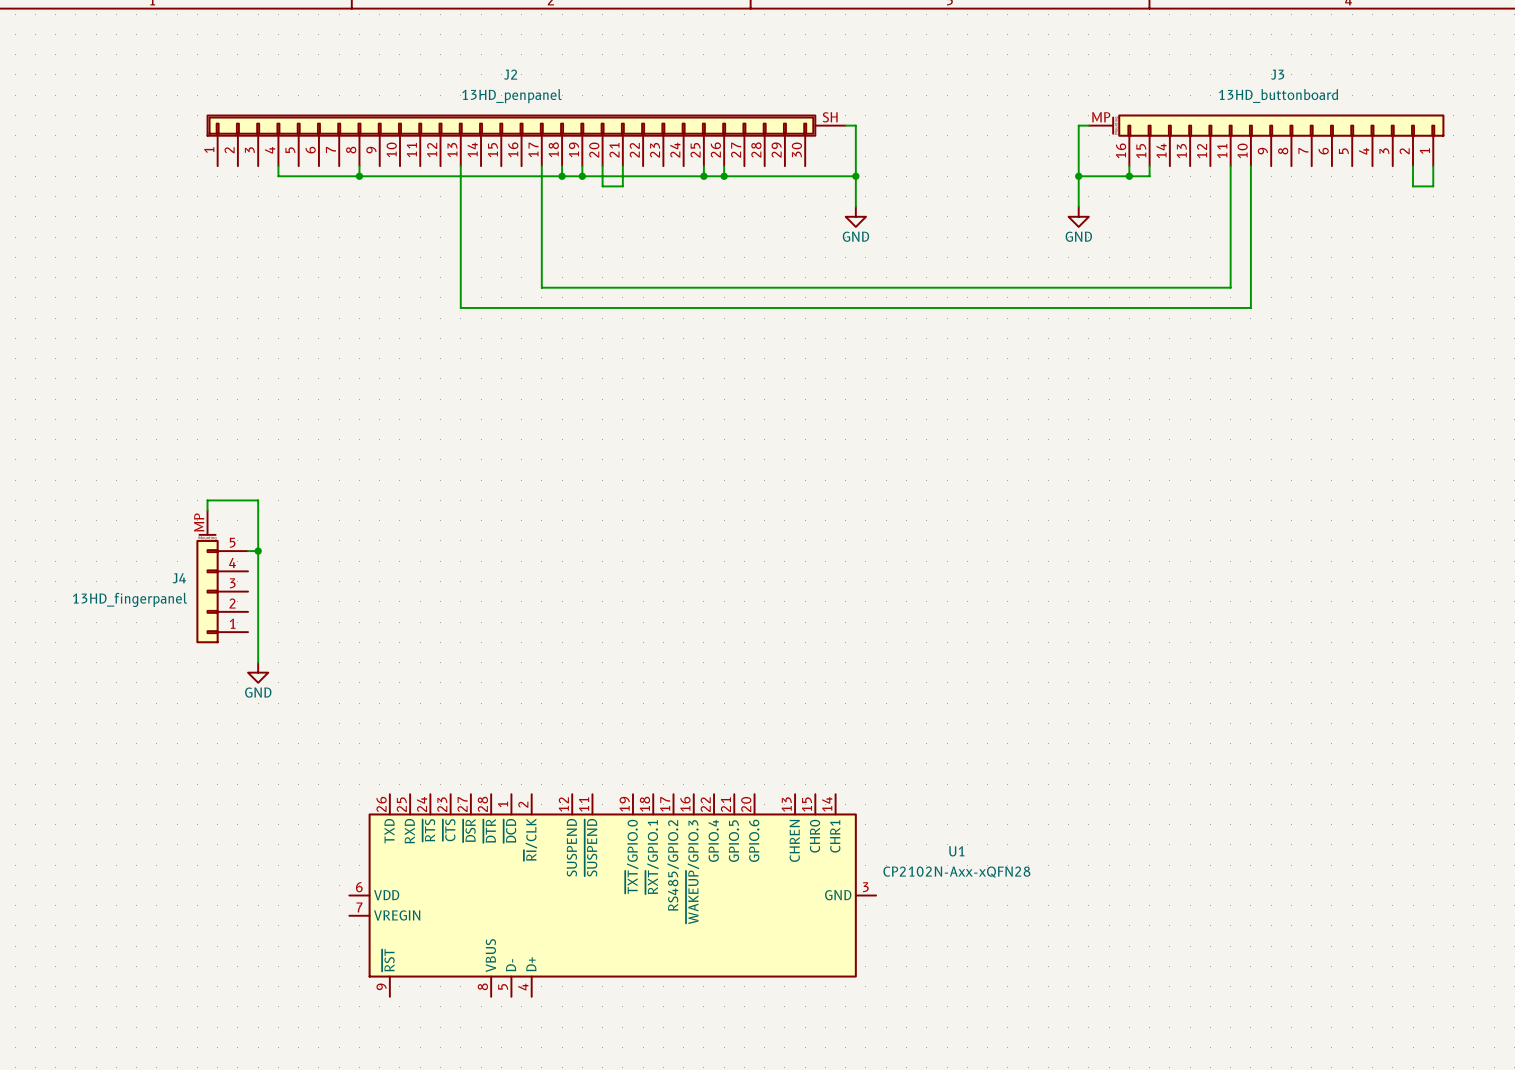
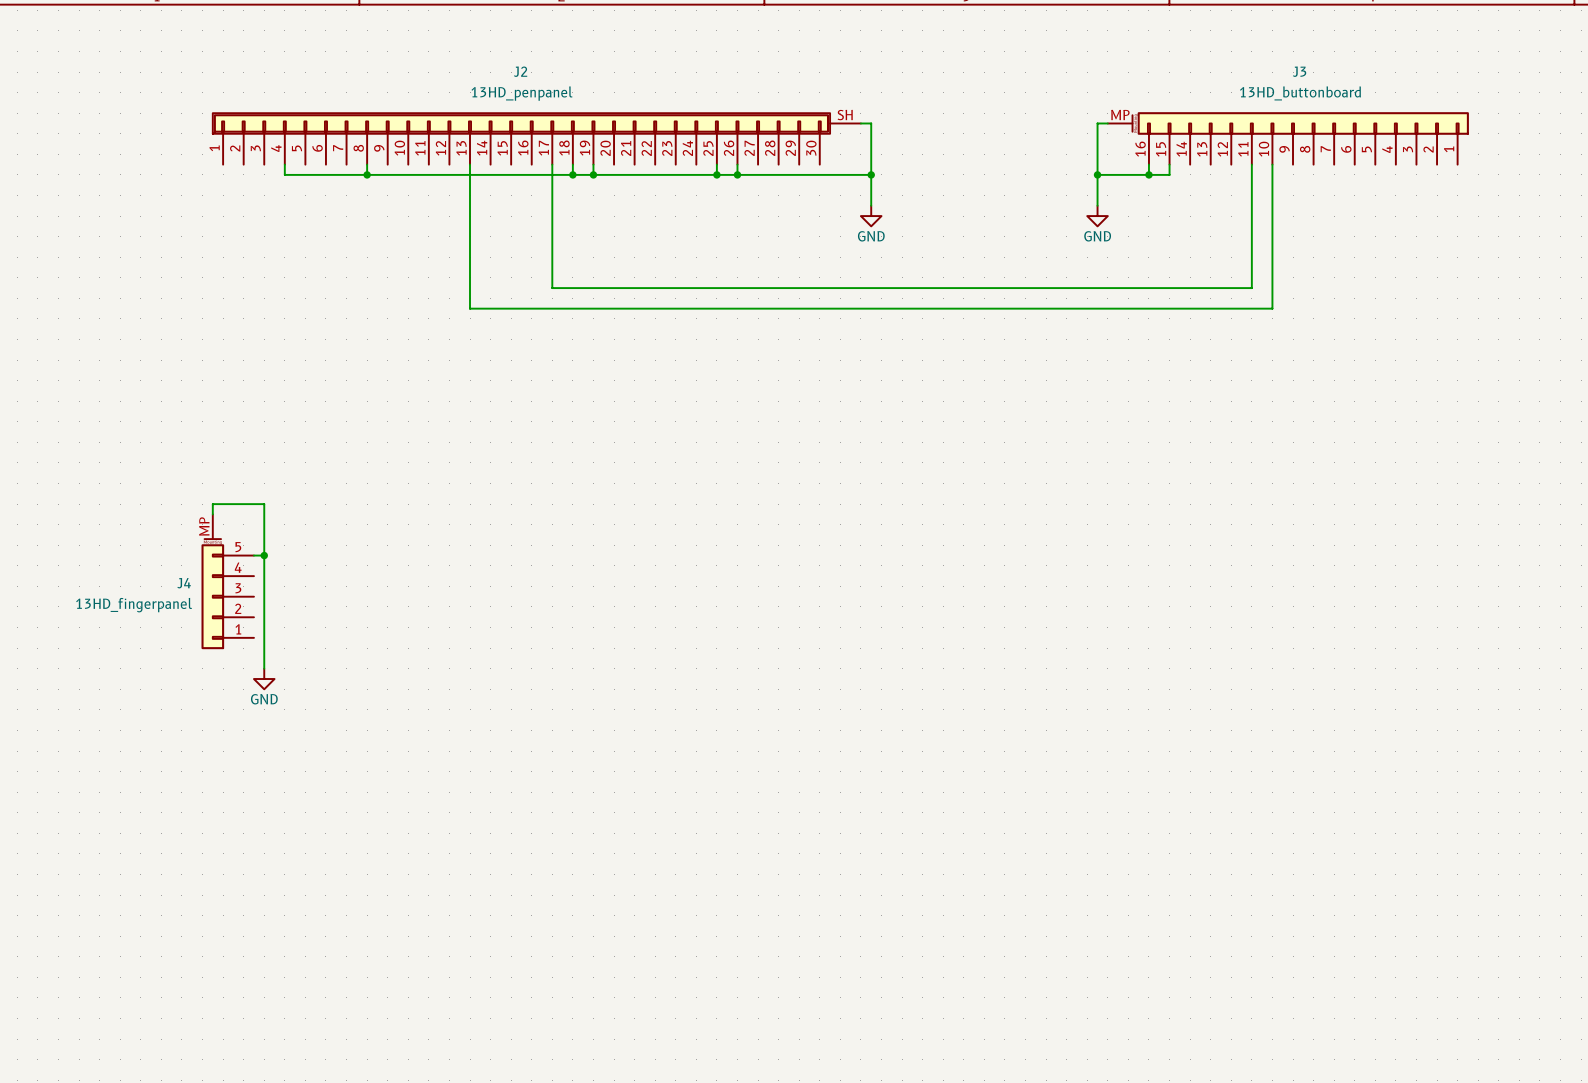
wire: (602, 166) (602, 186) (622, 186) (622, 166) -> none
wire: (1413, 166) (1413, 186) (1433, 186) (1433, 166) -> none
U1: CP2102N-Axx-xQFN28 (612, 895) -> none

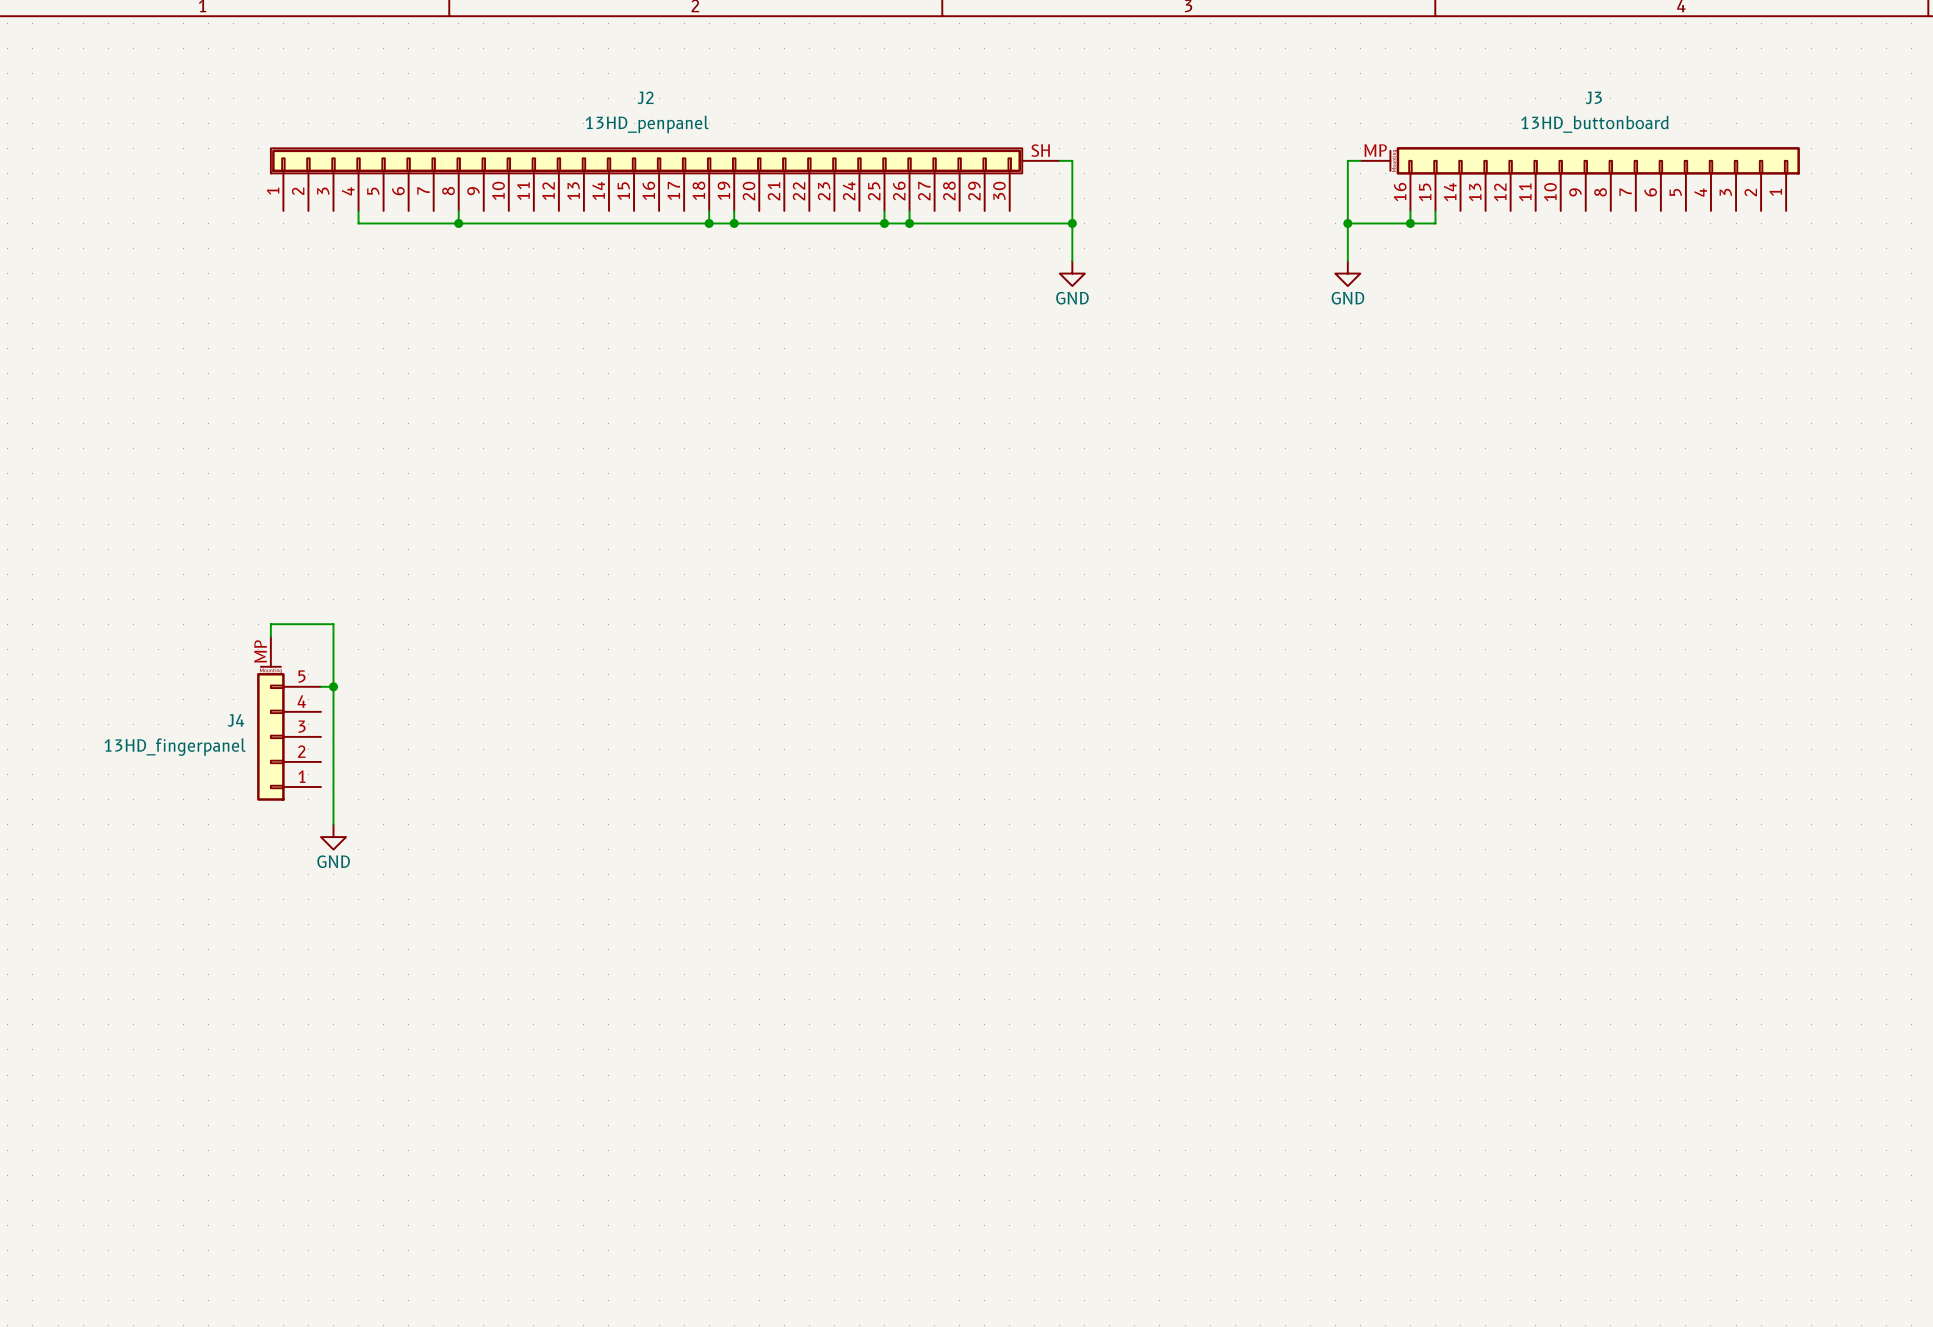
wire: (470, 164) (470, 308) (1272, 308) (1272, 164) -> none
wire: (552, 164) (552, 288) (1251, 288) (1251, 164) -> none

